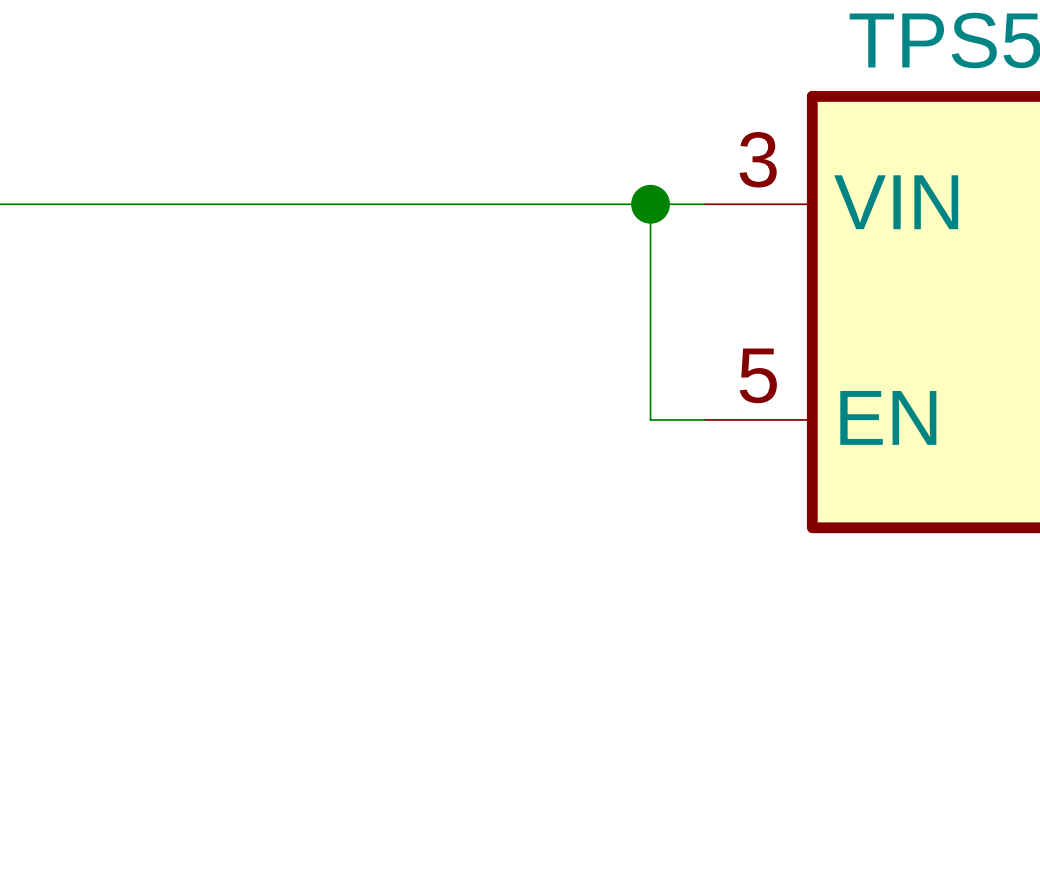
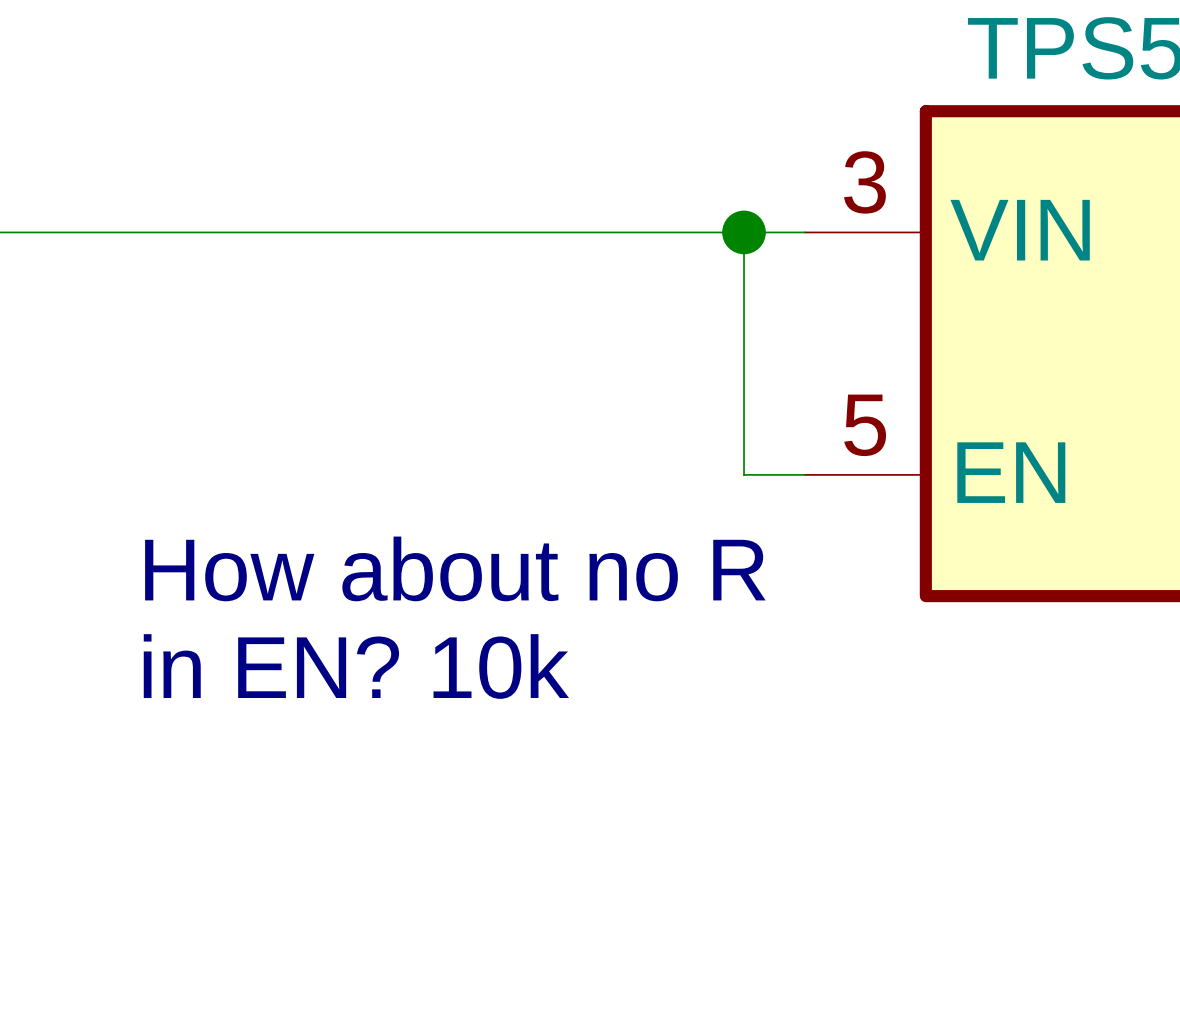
text: none -> How about no R (455, 568)
text: none -> in EN? 10k (356, 666)

